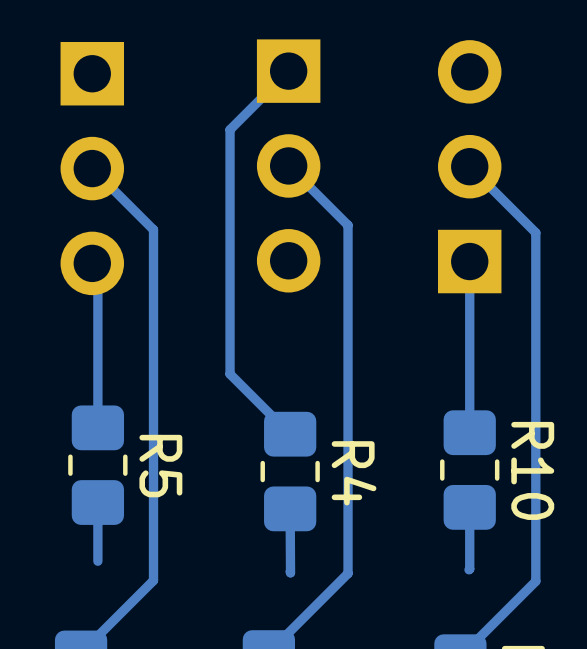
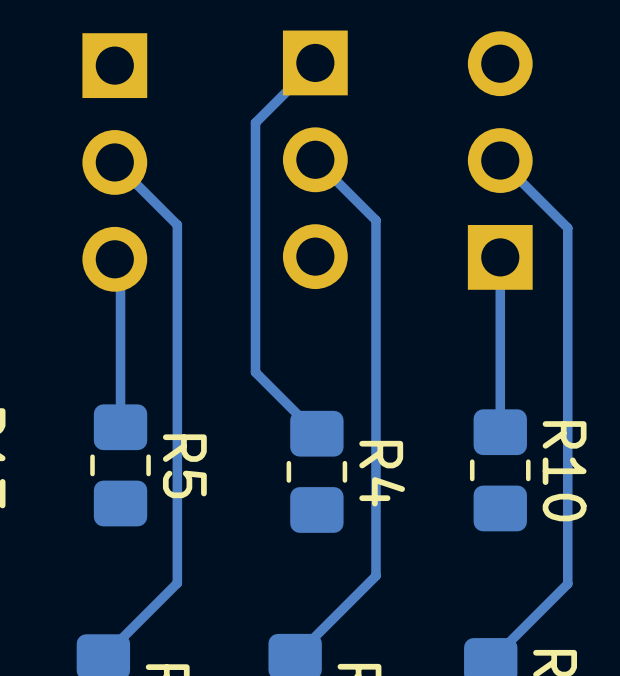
track: (97, 502) (97, 561) -> none
track: (469, 507) (468, 569) -> none
track: (290, 508) (290, 571) -> none

